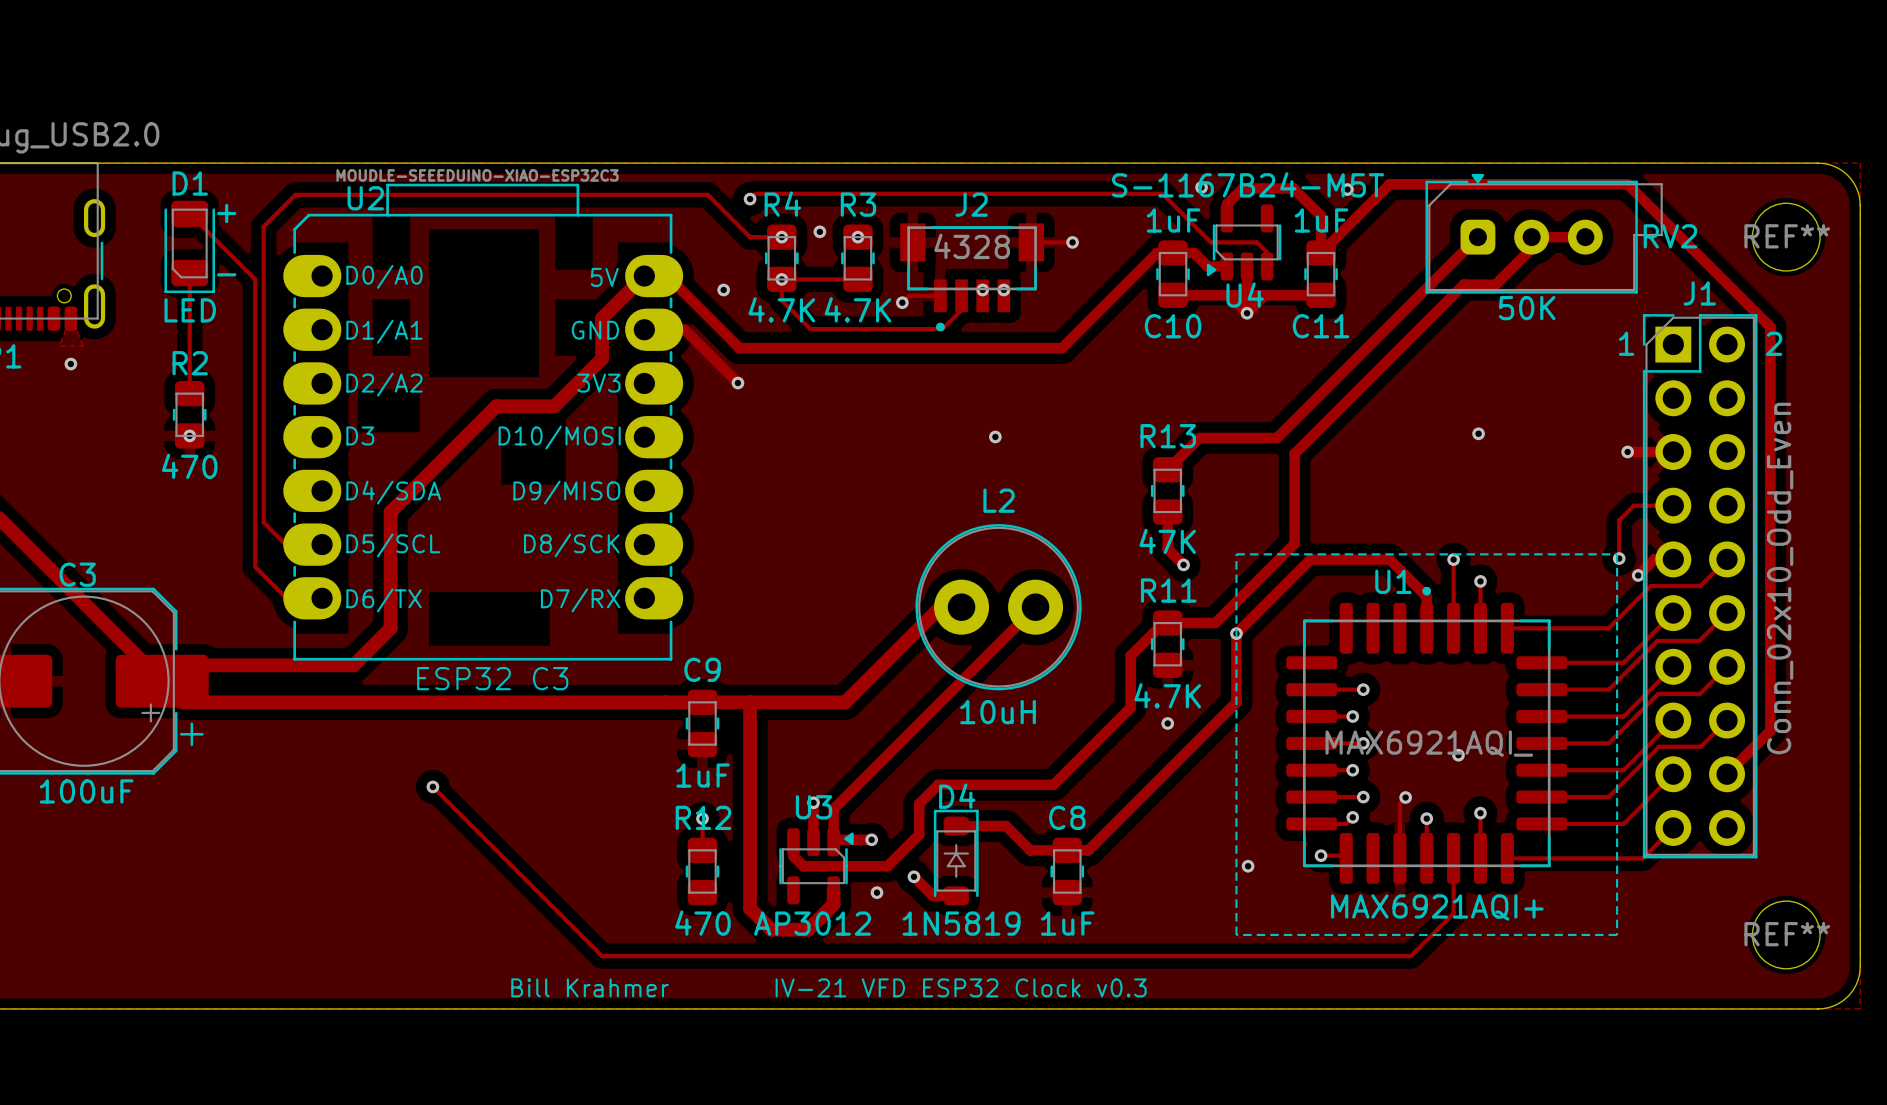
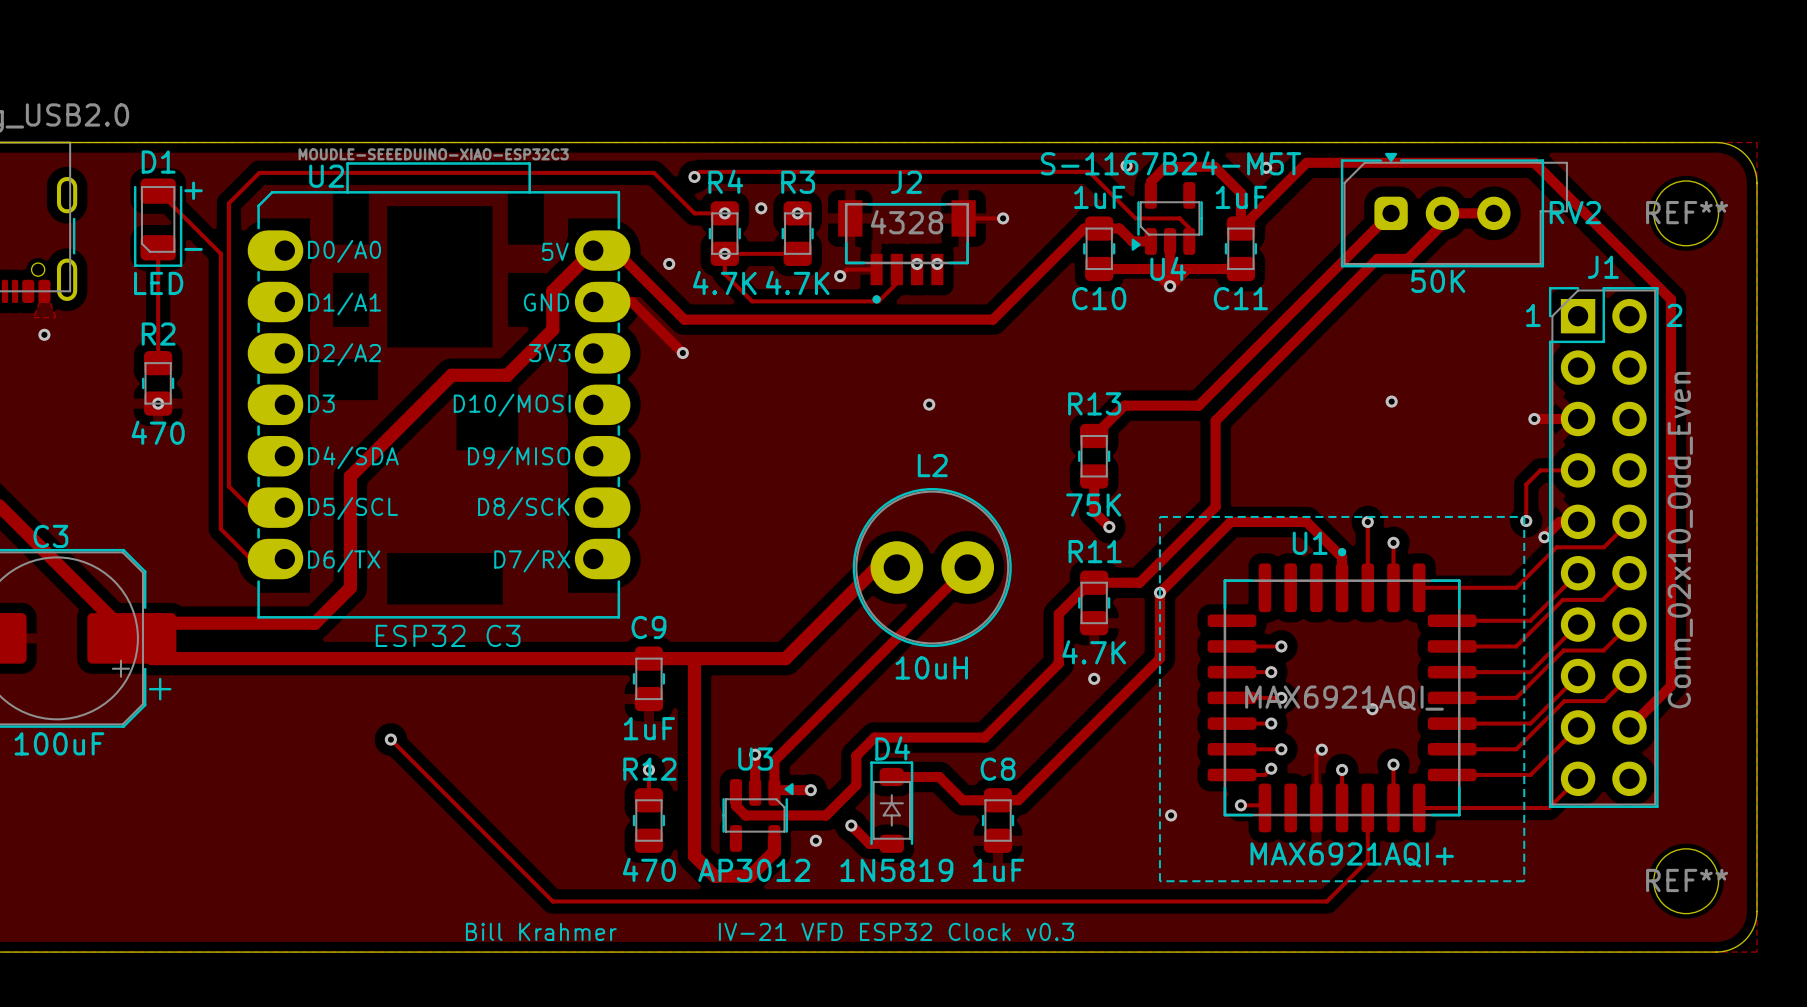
R13 value: 47K (1167, 541) -> 75K (1093, 505)

